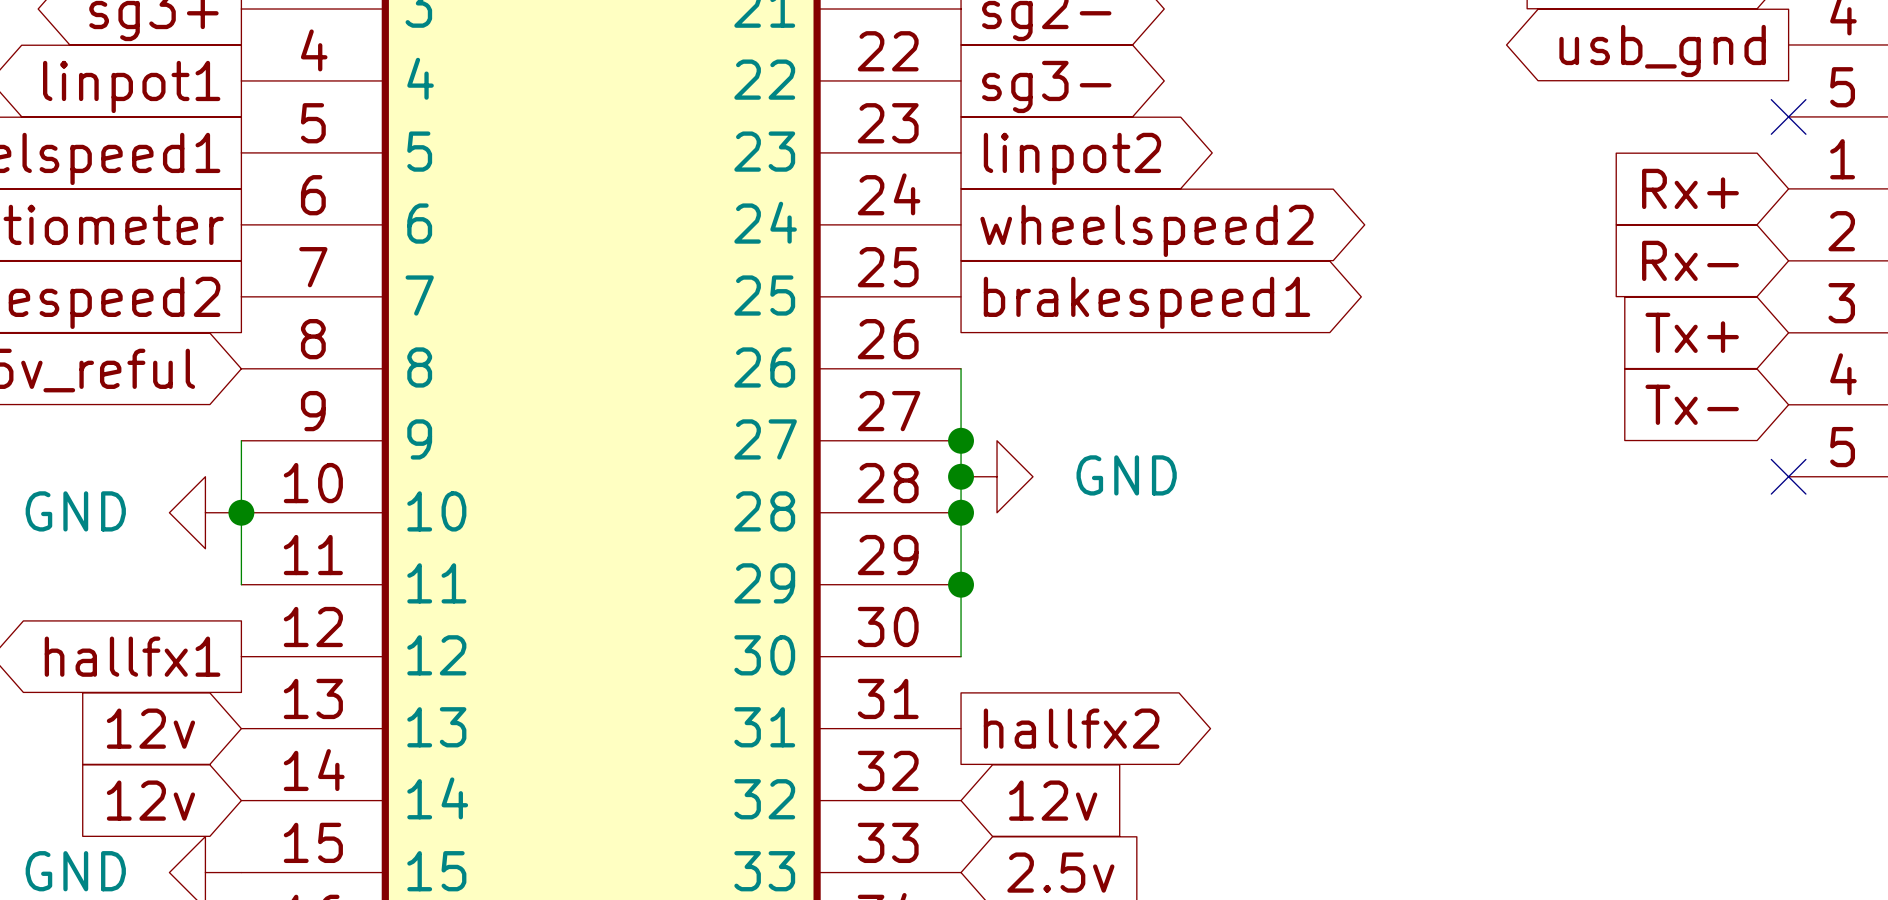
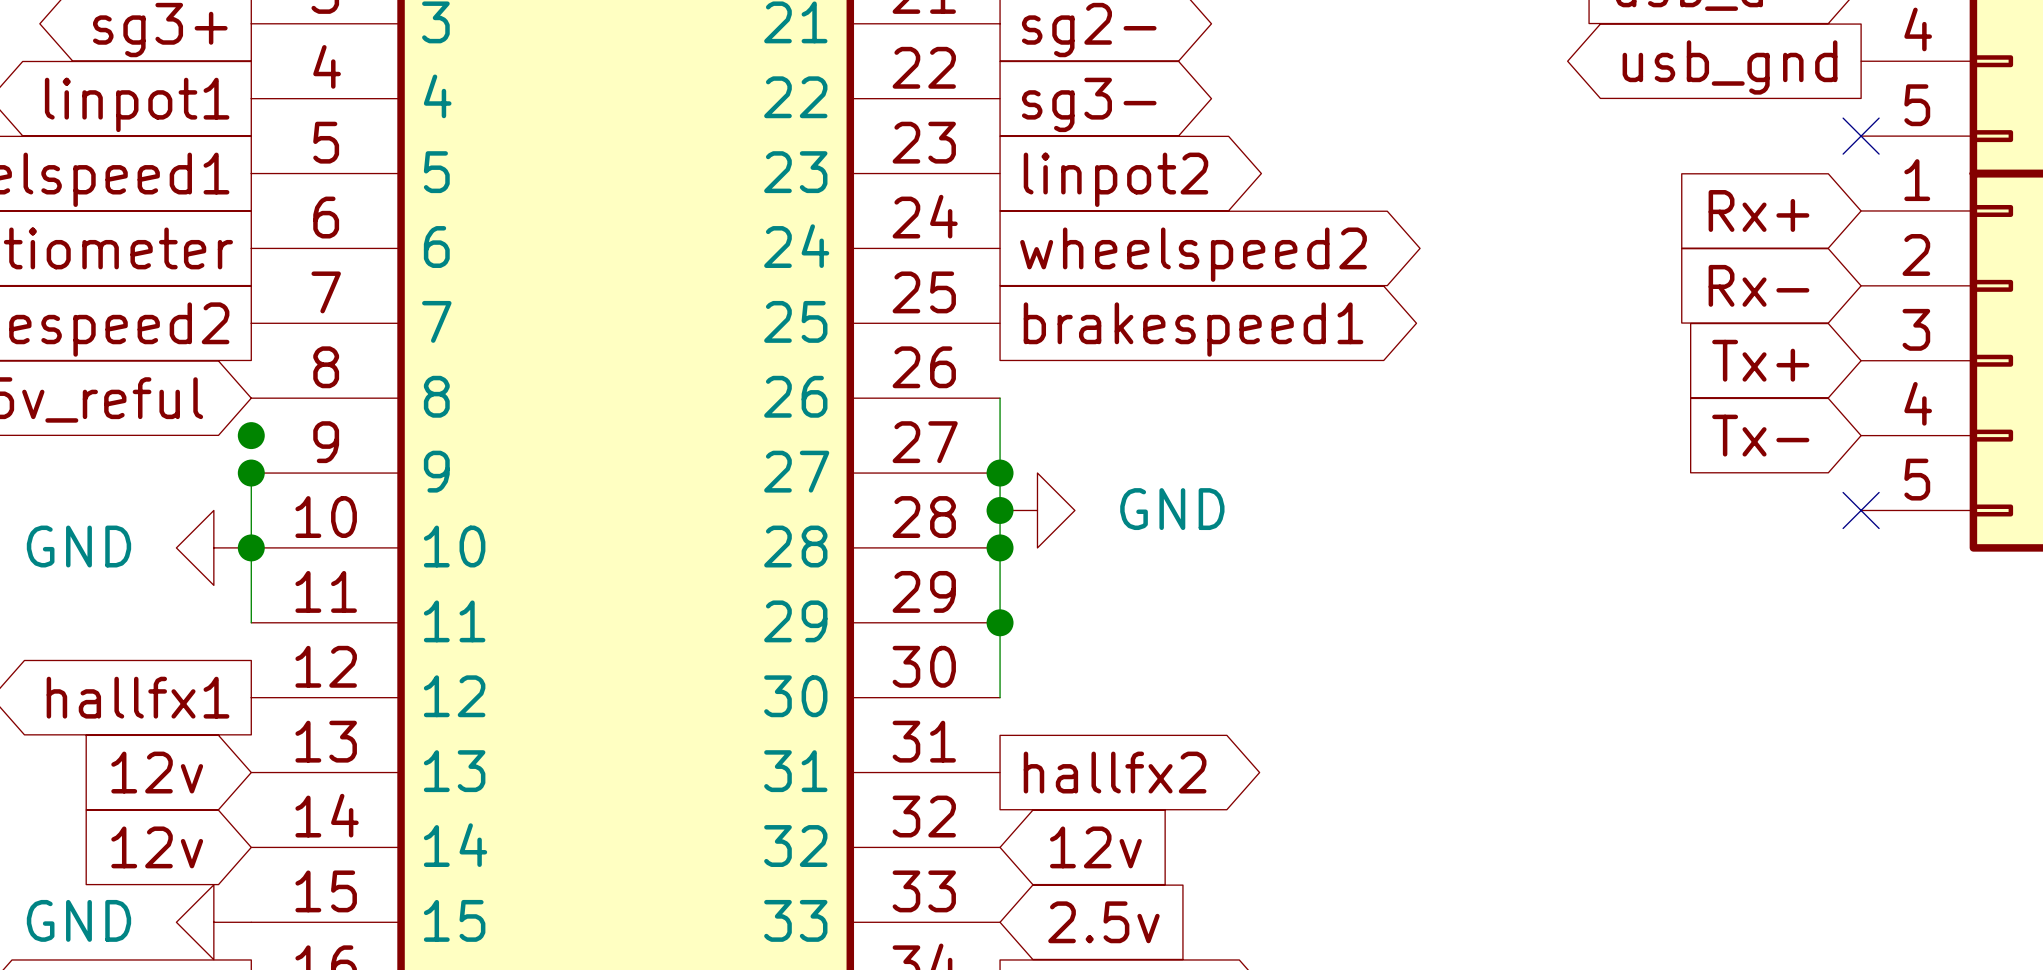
junction: none -> (251, 435)
junction: none -> (251, 473)

